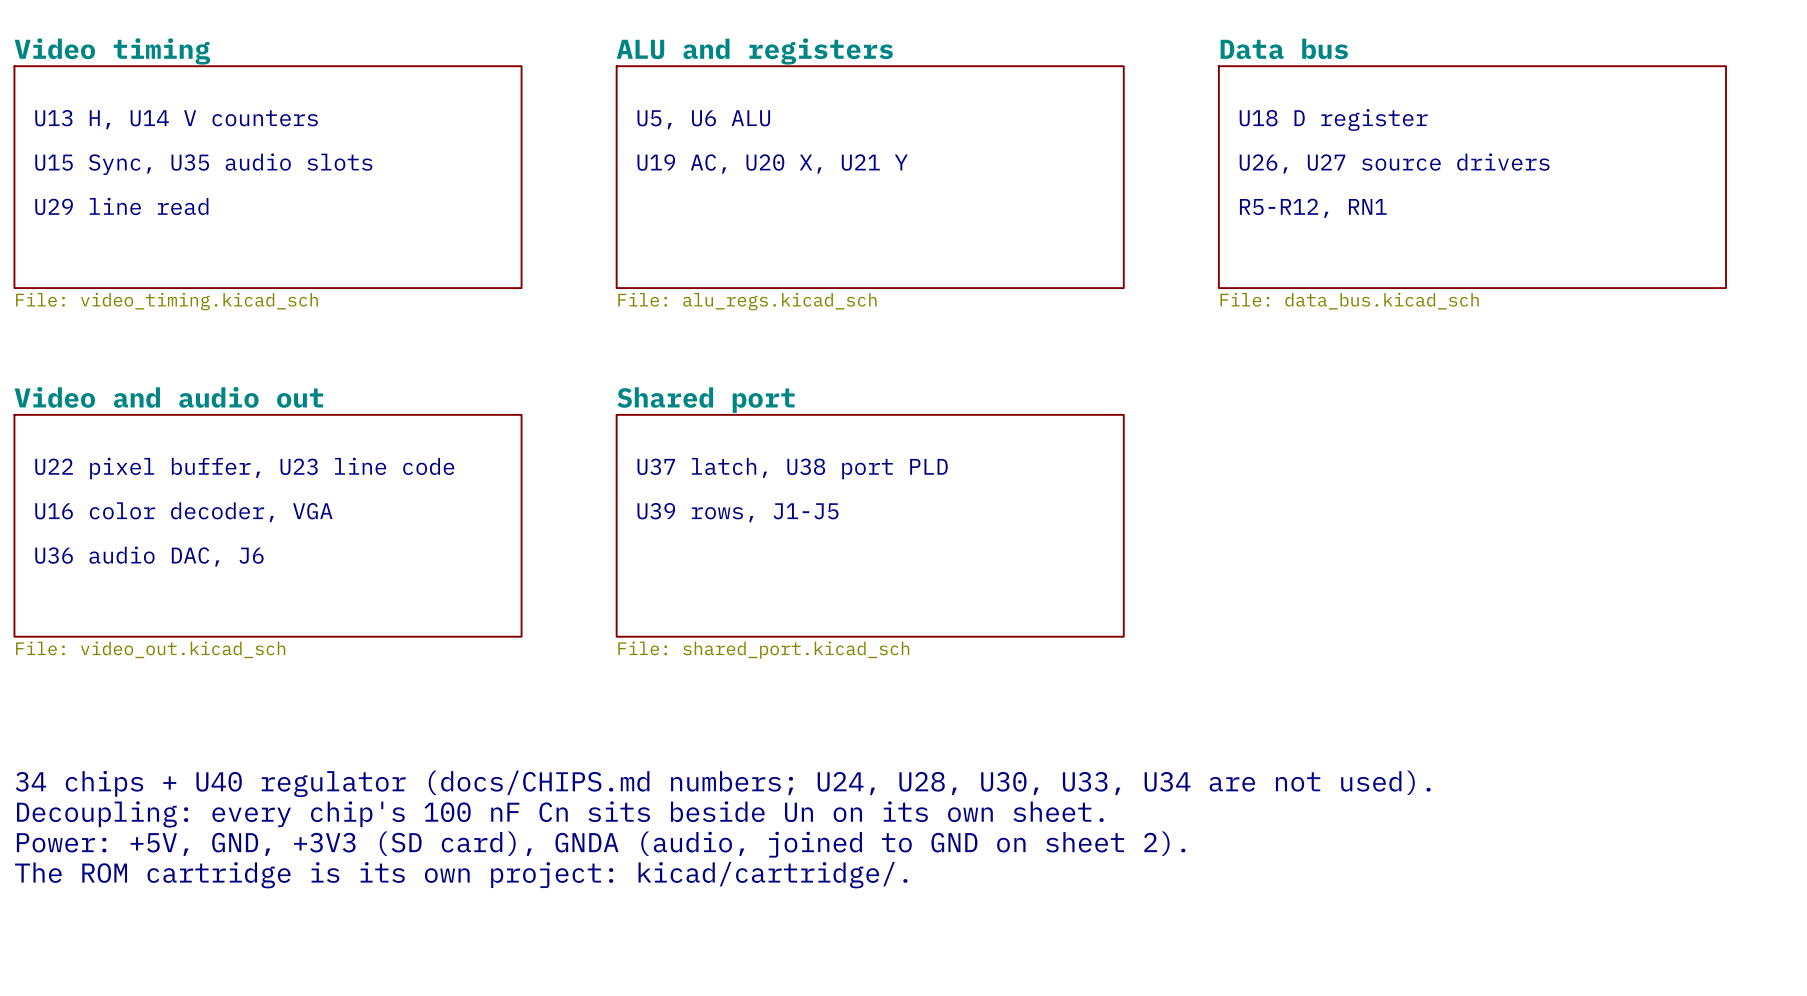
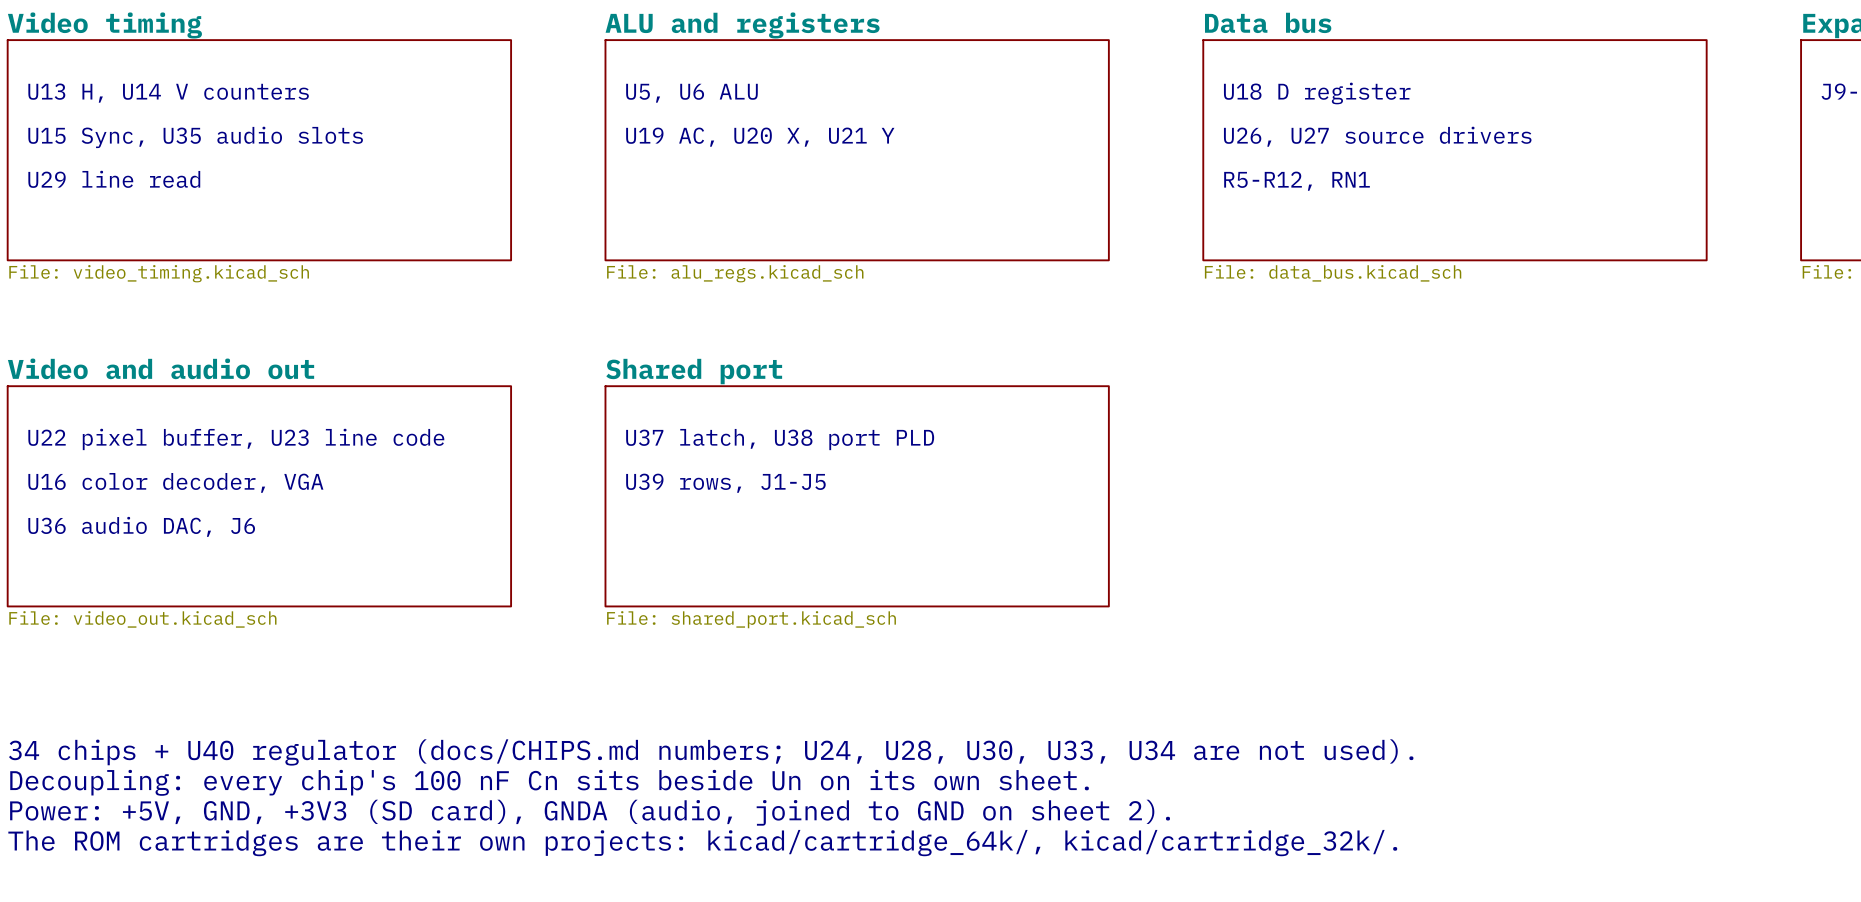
text: The ROM cartridge is its own project: kicad/cartridge/. (461, 875) -> The ROM cartridges are their own projects: kicad/cartridge_64k/, kicad/cartridge_32k/. (702, 843)

